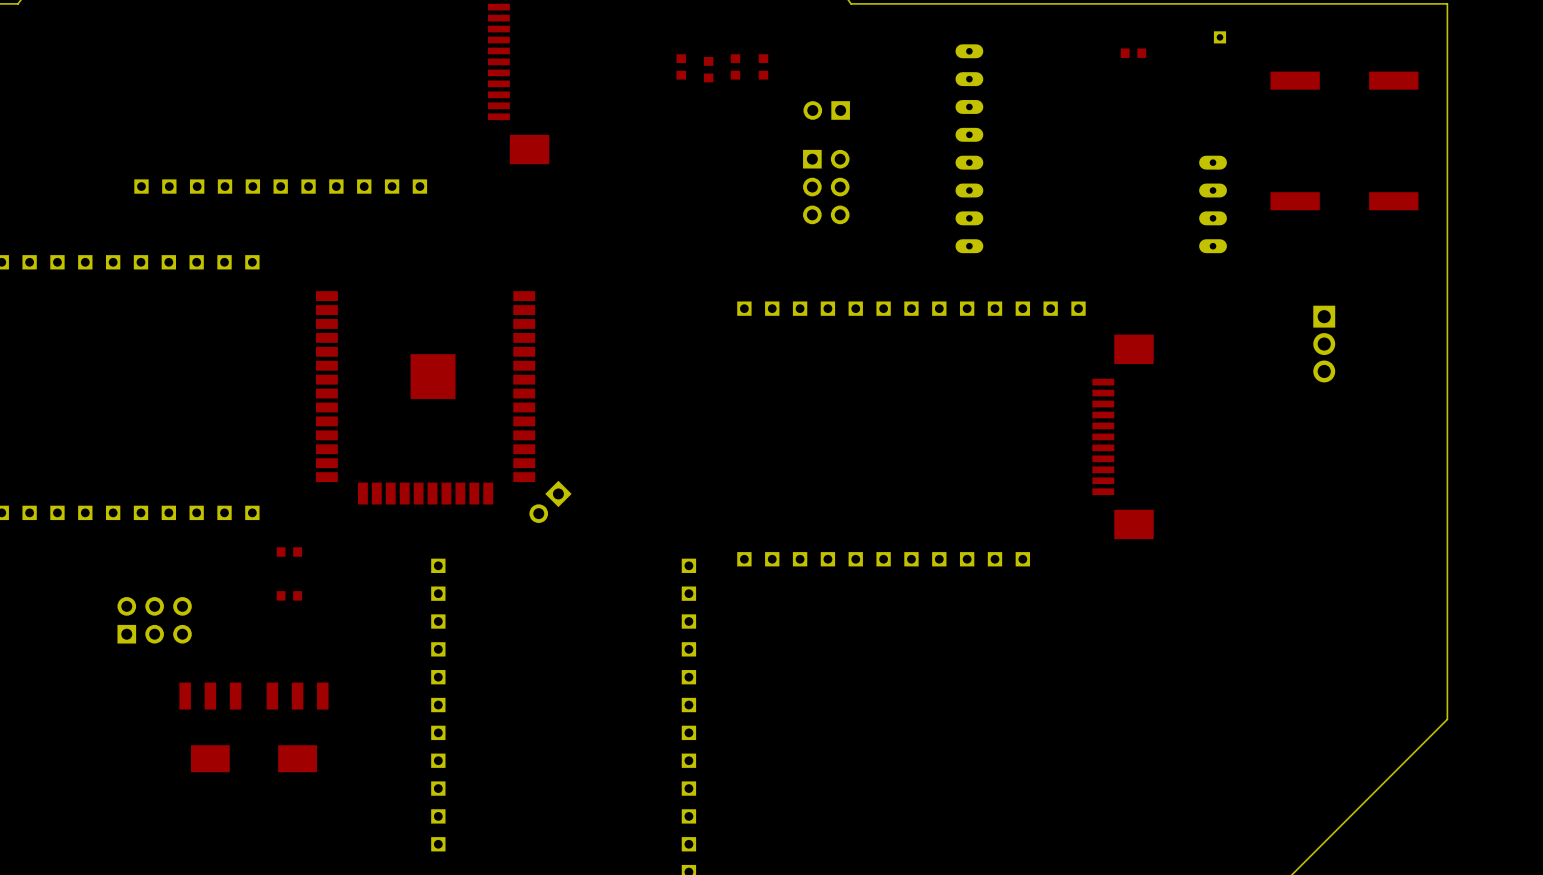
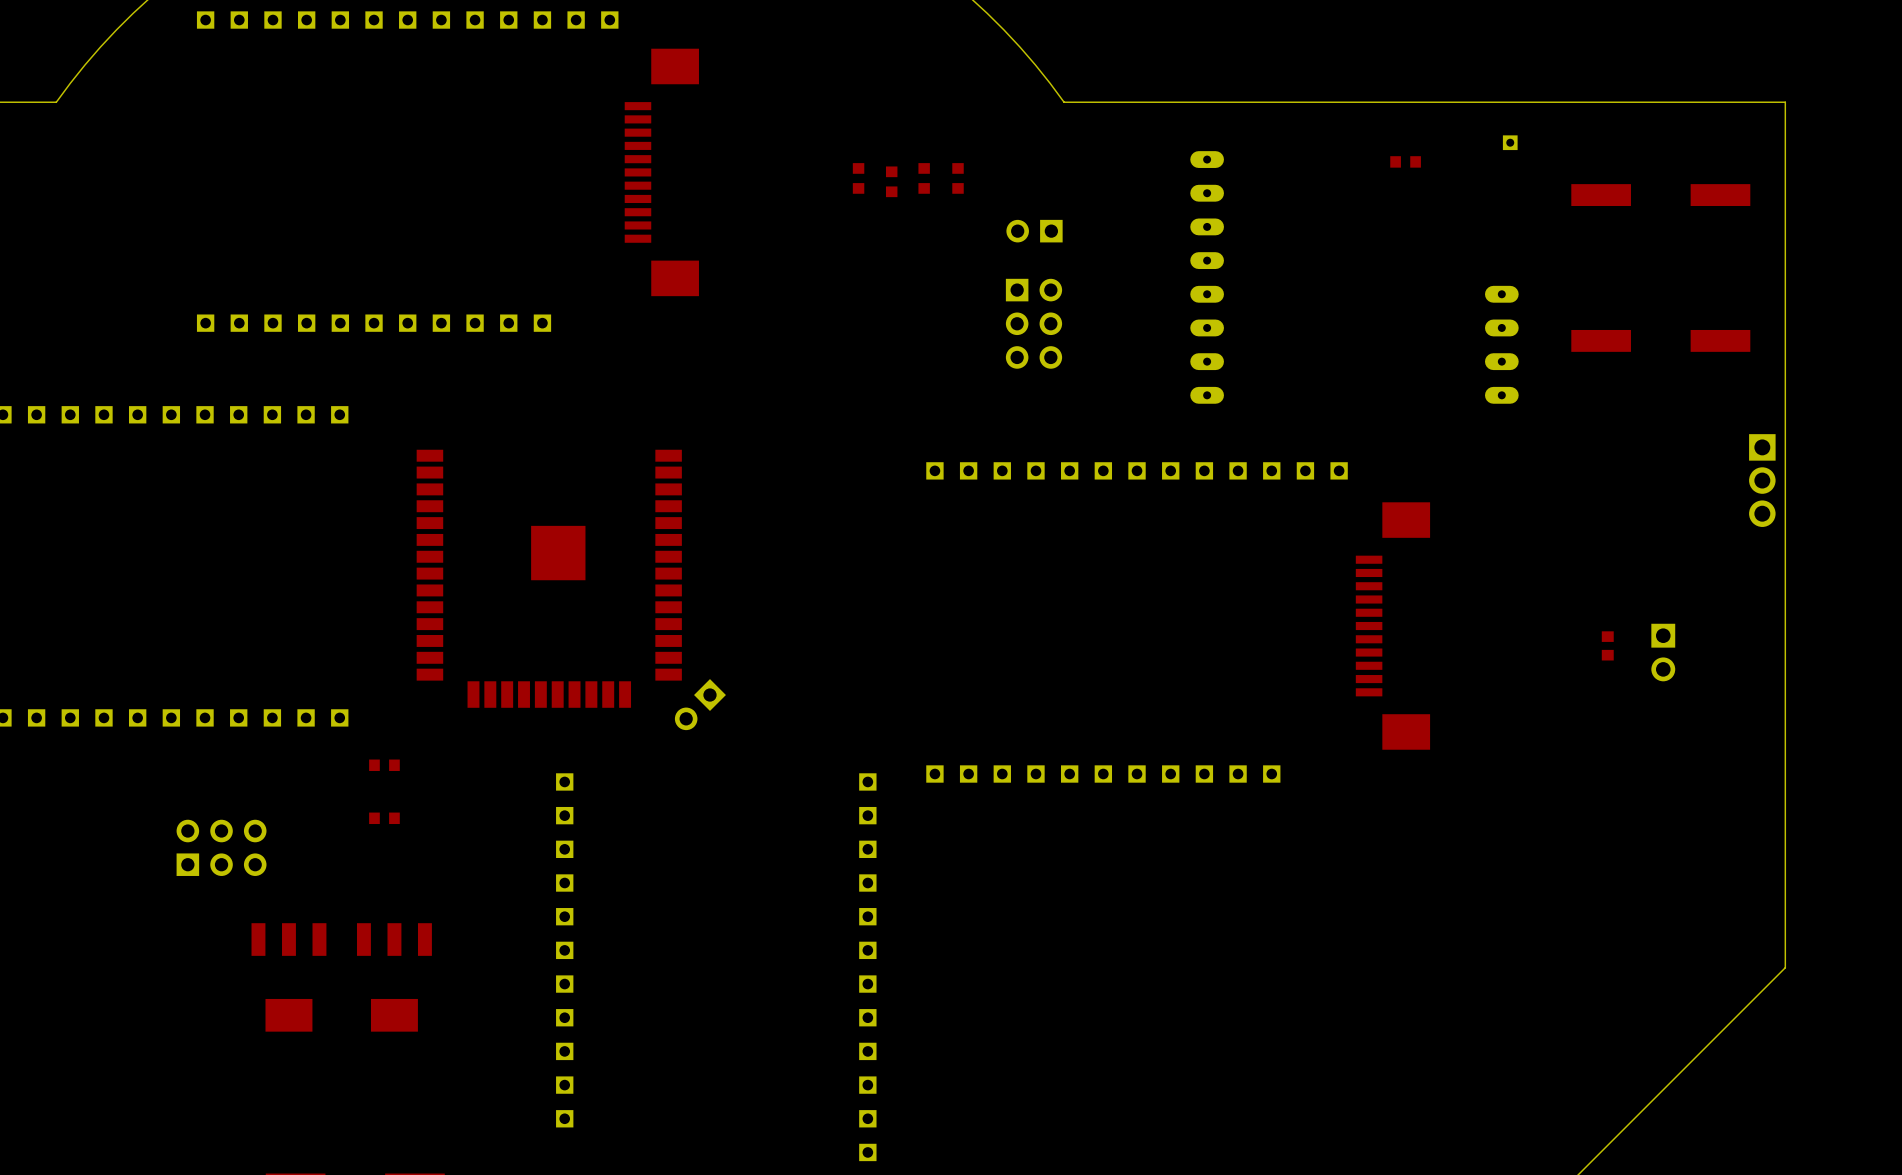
part position: (1324, 344) -> (1762, 480)
part: none -> (1607, 645)
part: none -> (1663, 652)

